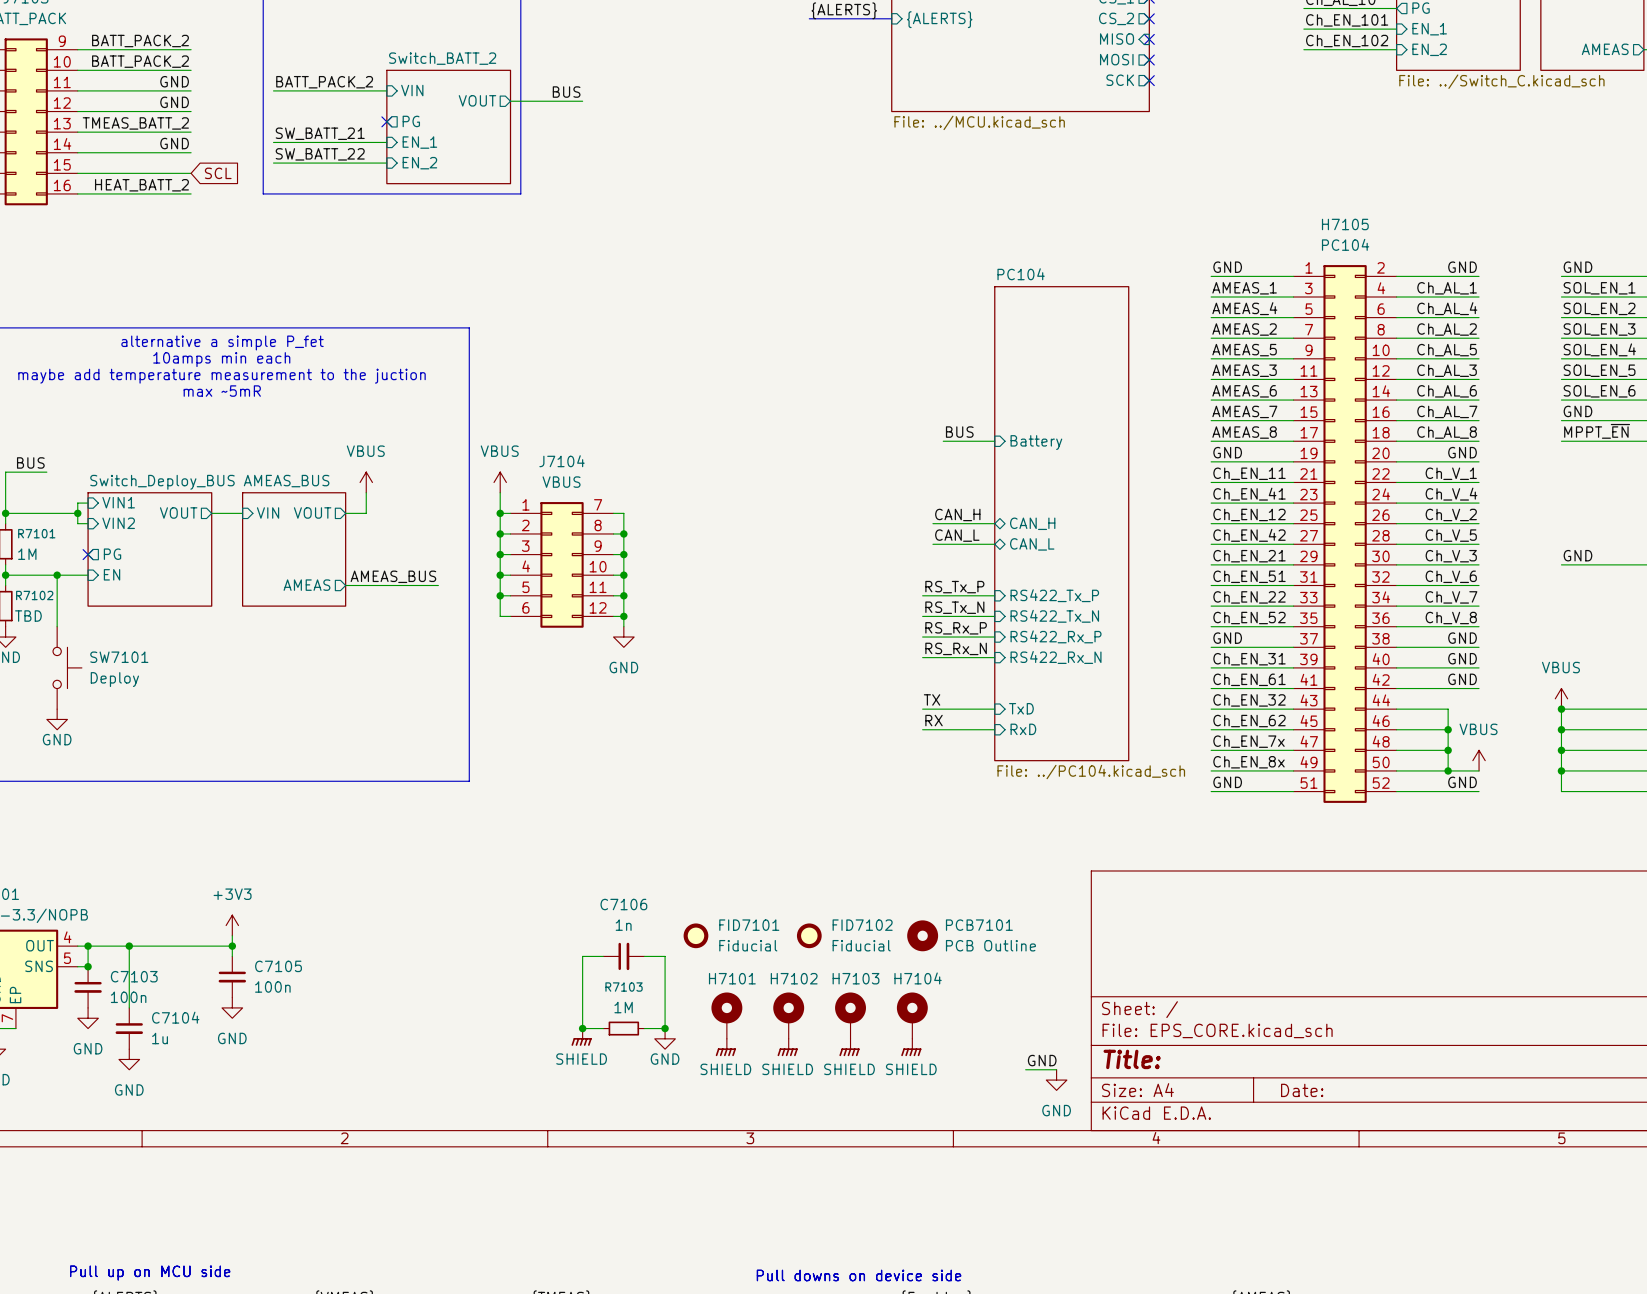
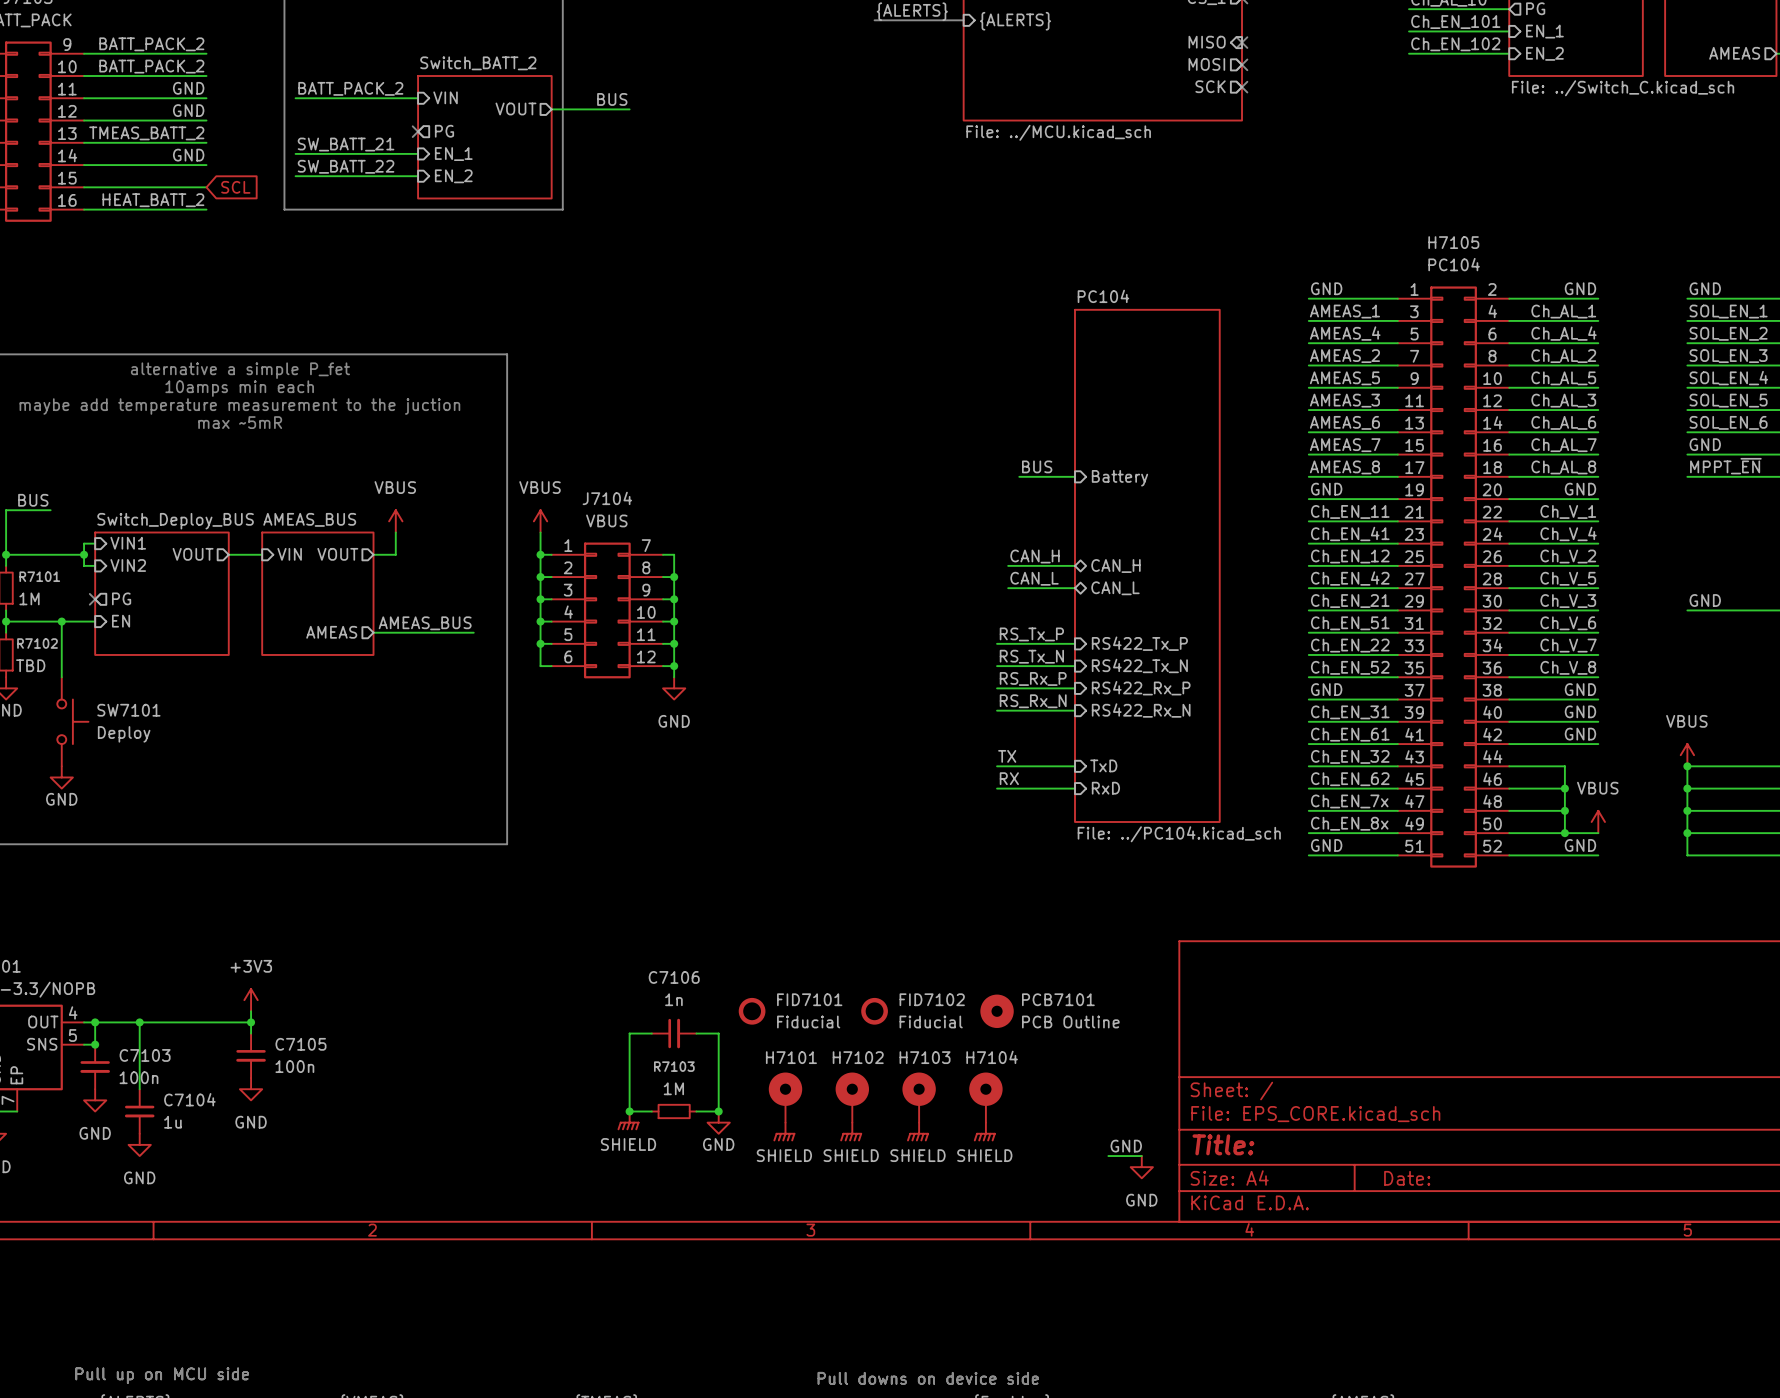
sheet pin: CS_2 (1116, 18) -> none
no-connect mark: (1149, 18) -> none

